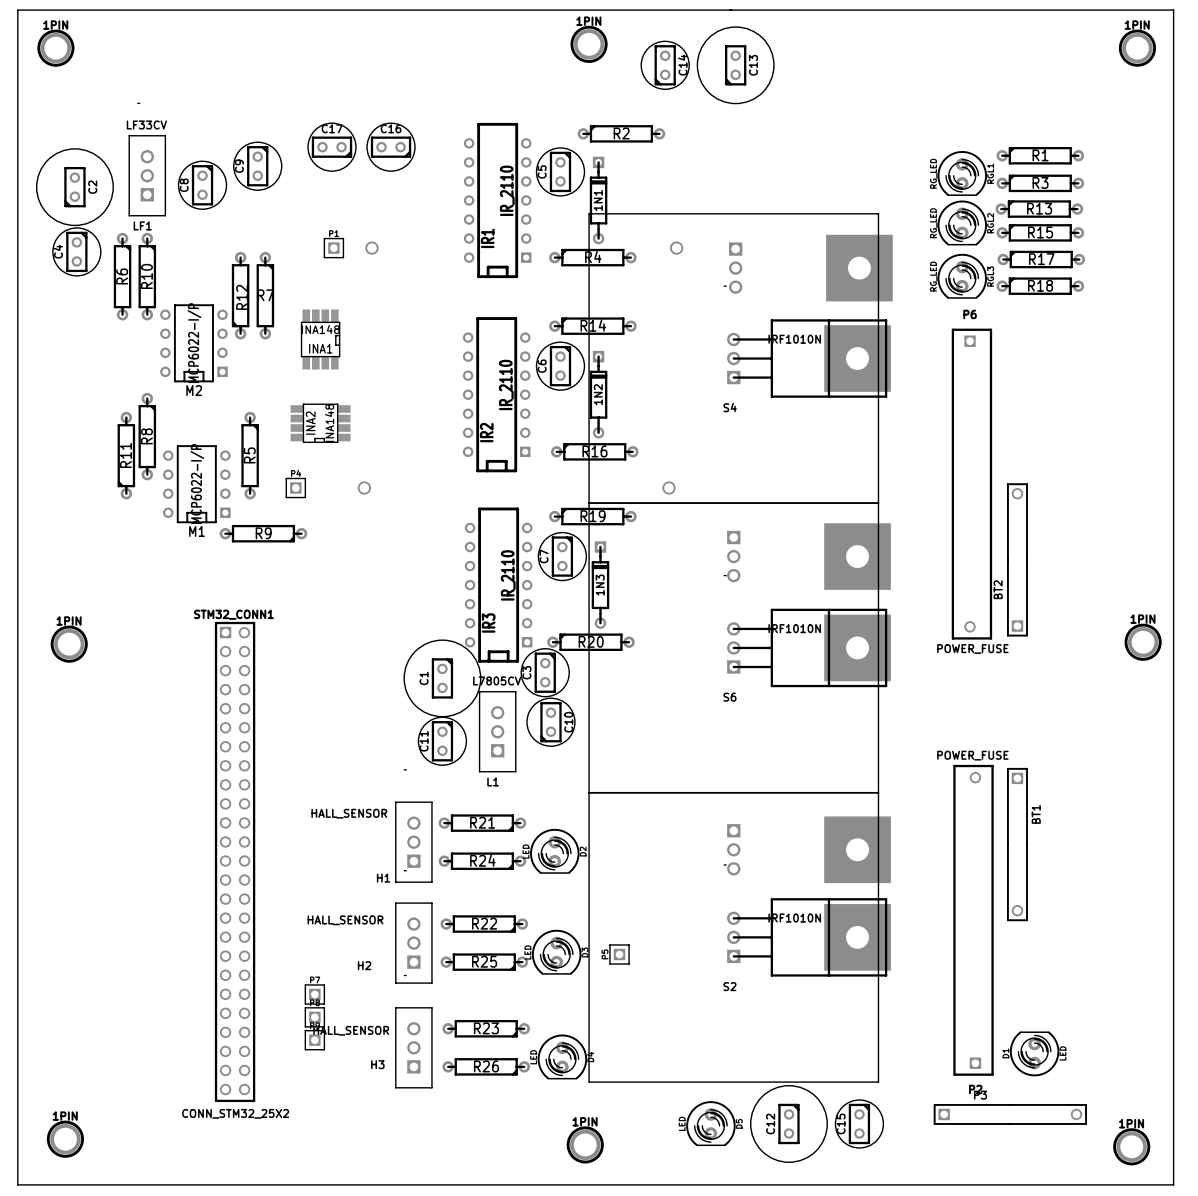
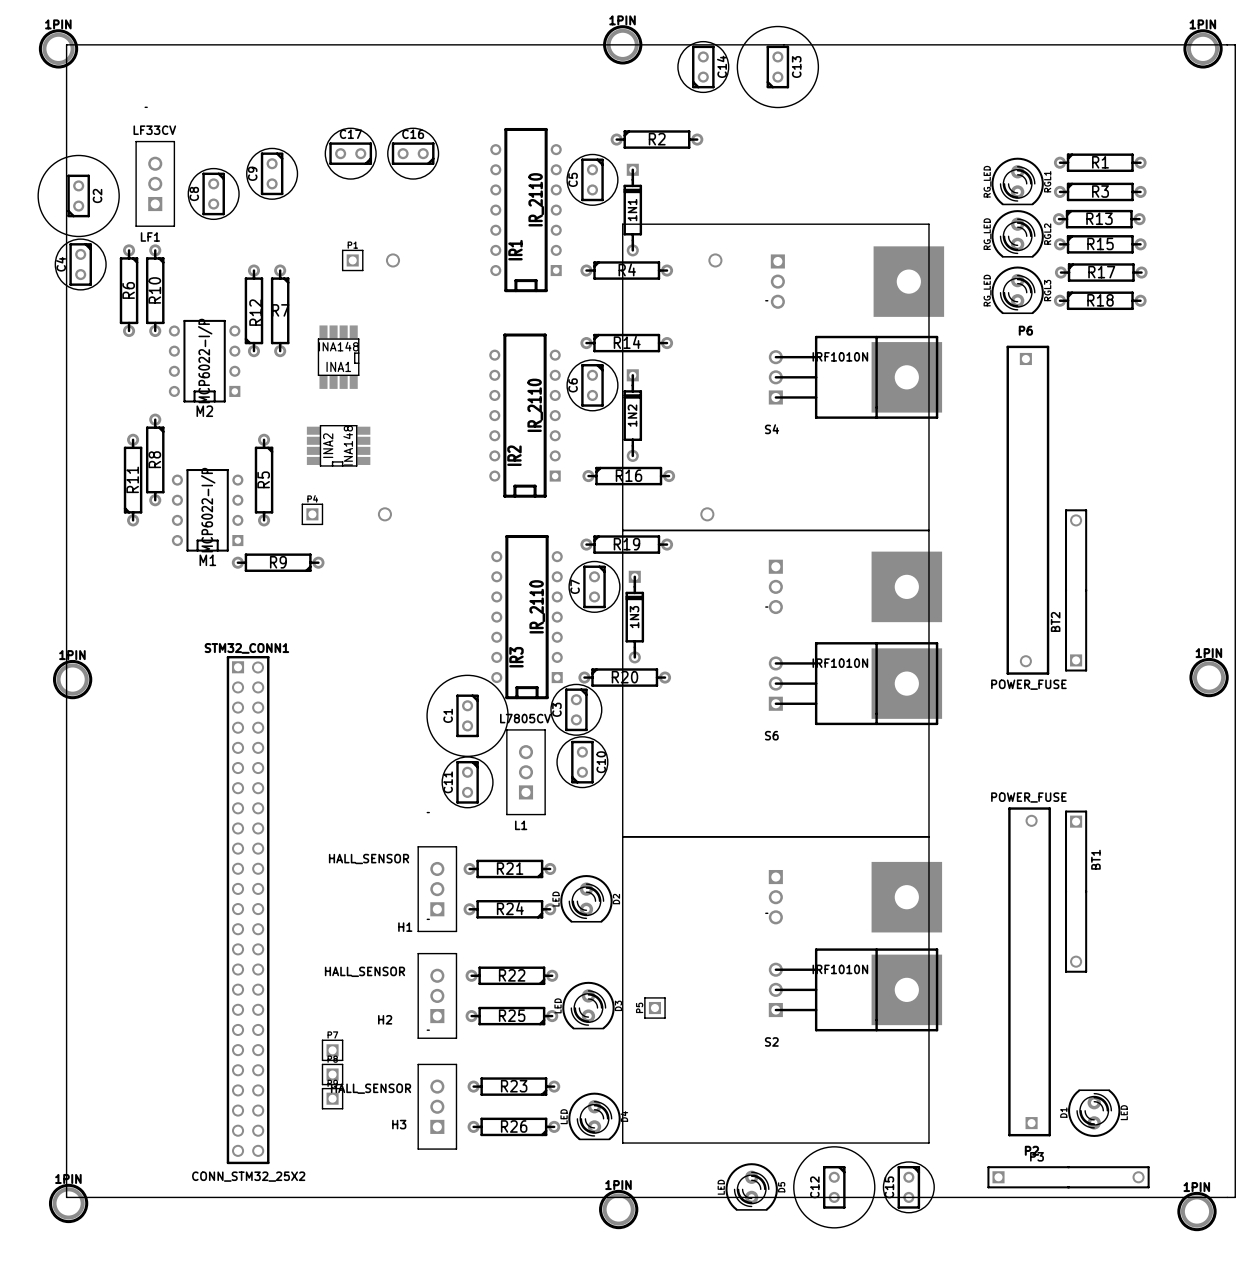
board edge: (17, 10) (1173, 10) (1173, 1184) (17, 1184) (17, 10) -> (66, 44) (66, 1197) (1235, 1197) (1235, 44) (66, 44)

